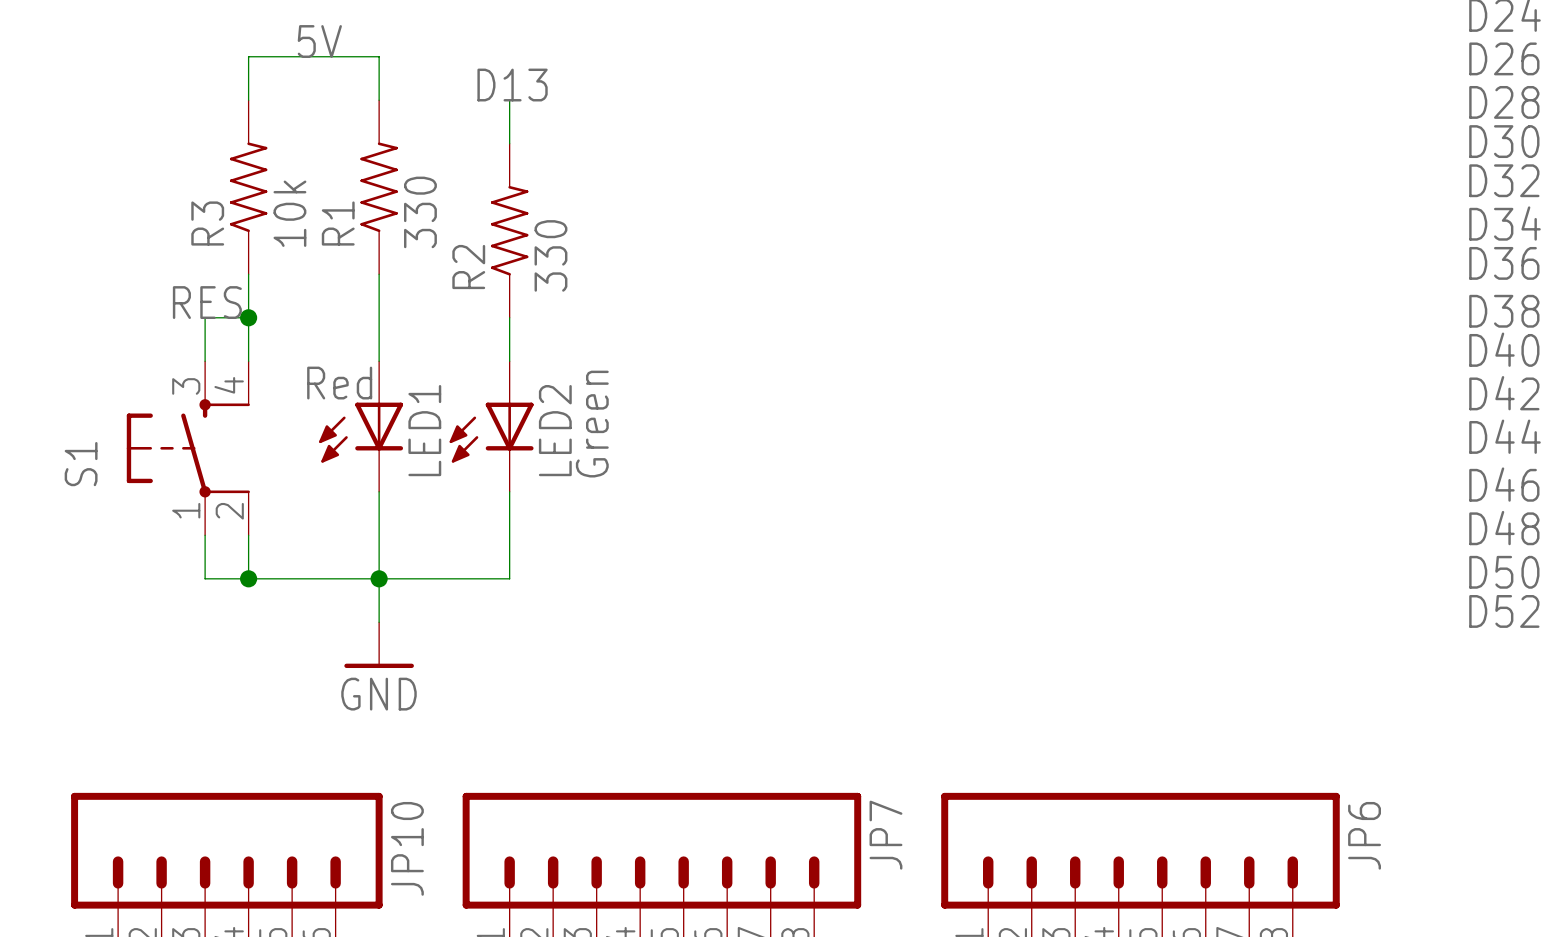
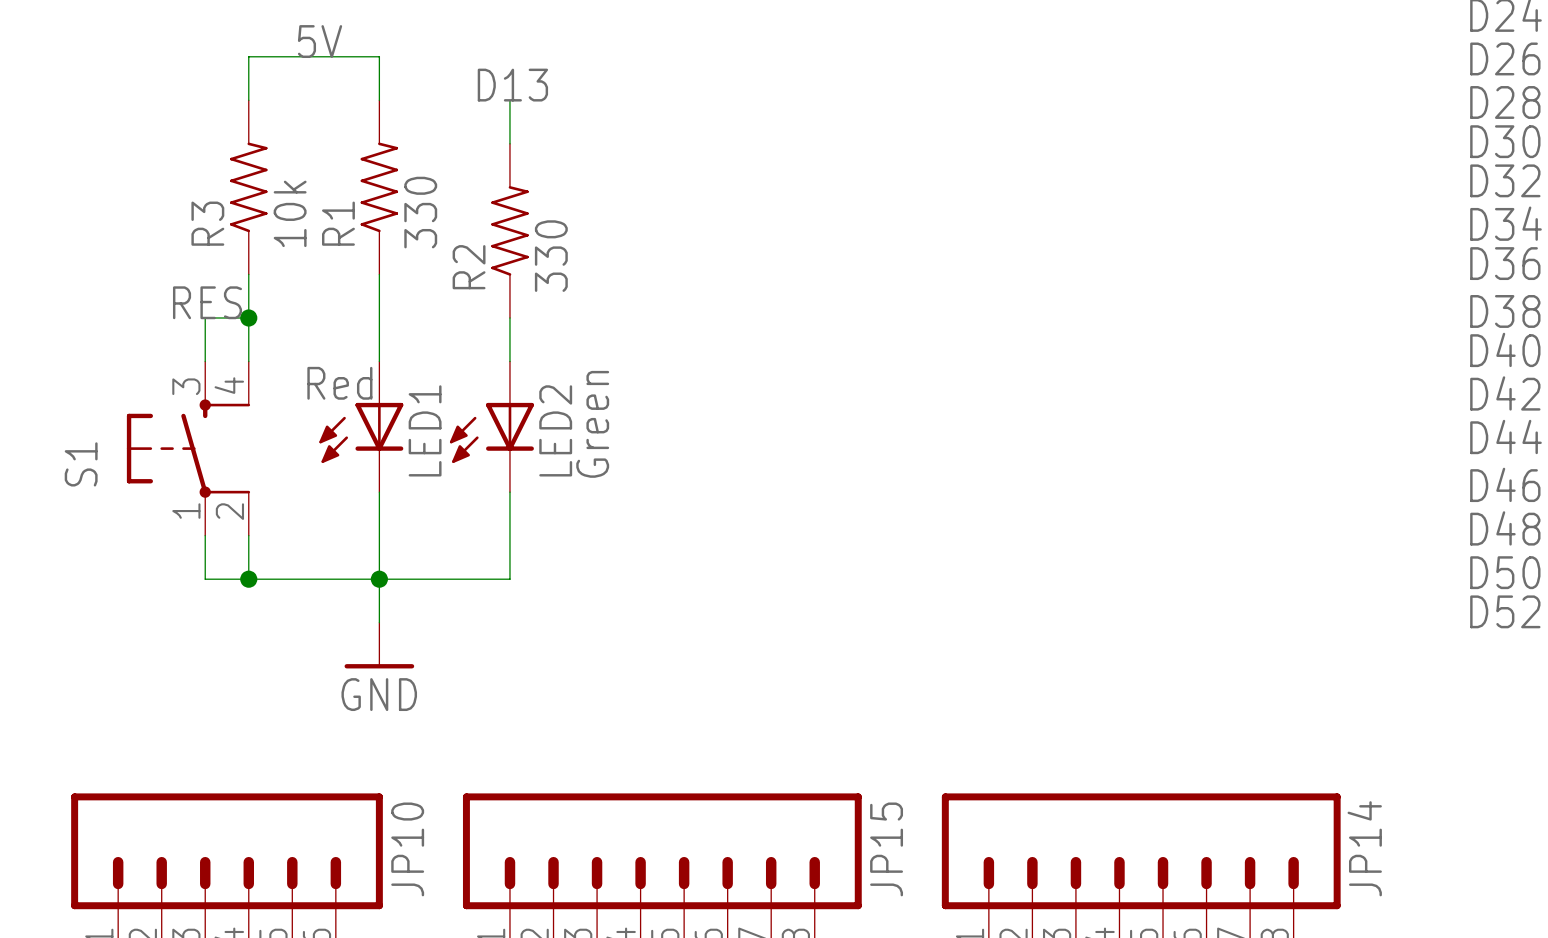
JP7 name: JP7 (885, 835) -> JP15 (886, 849)
JP6 name: JP6 (1364, 835) -> JP14 (1364, 848)

